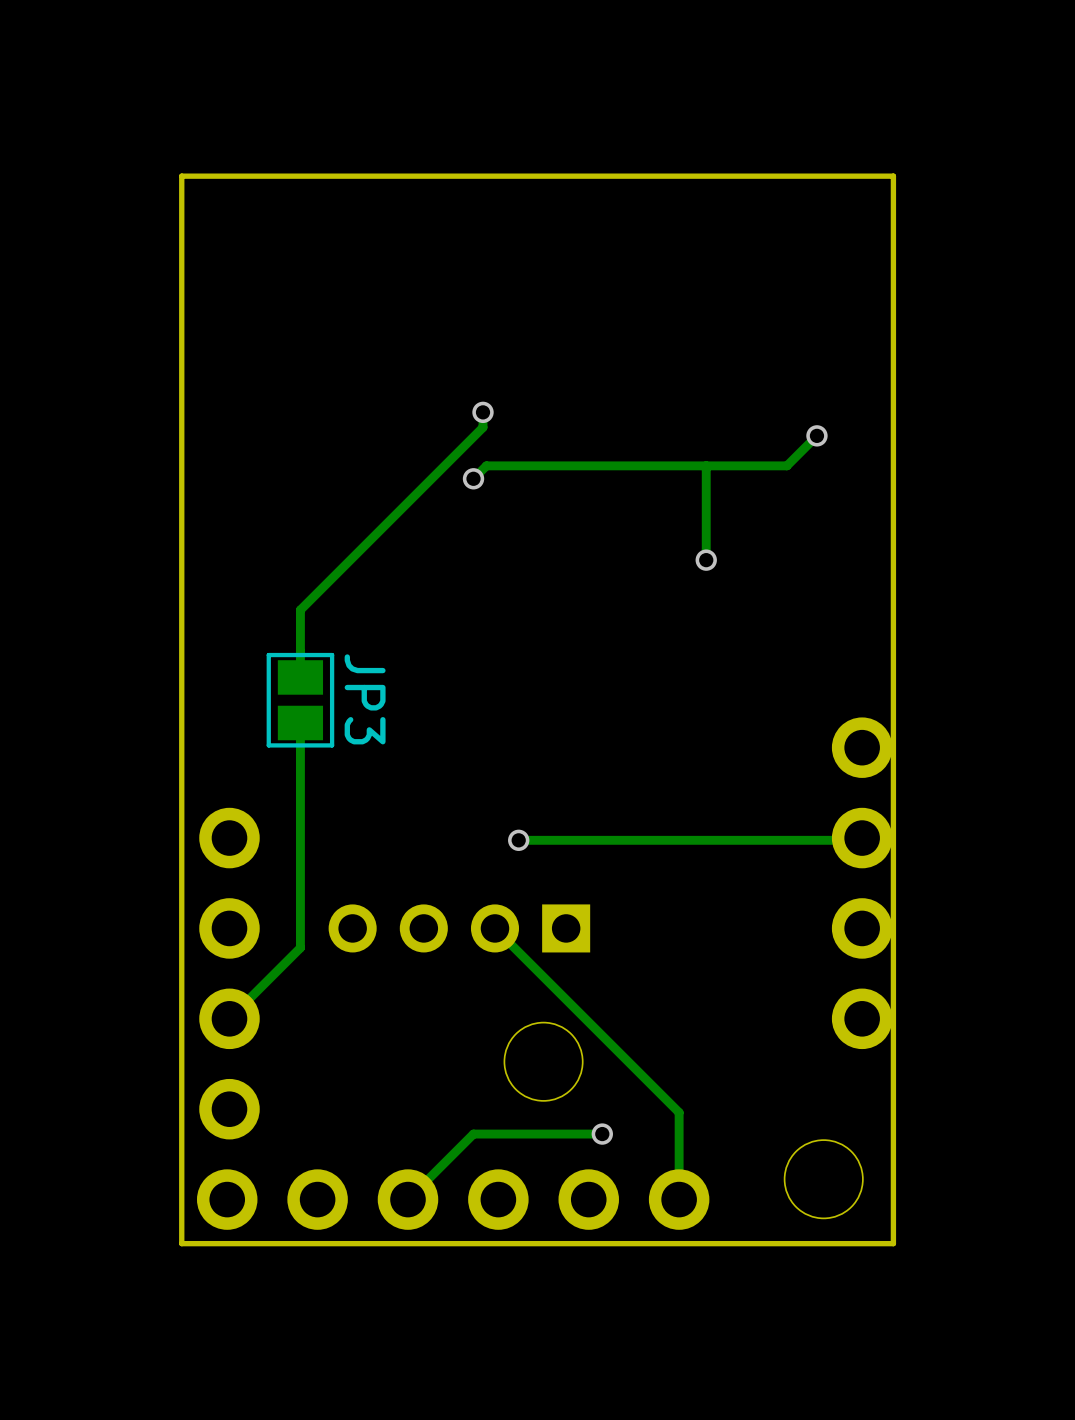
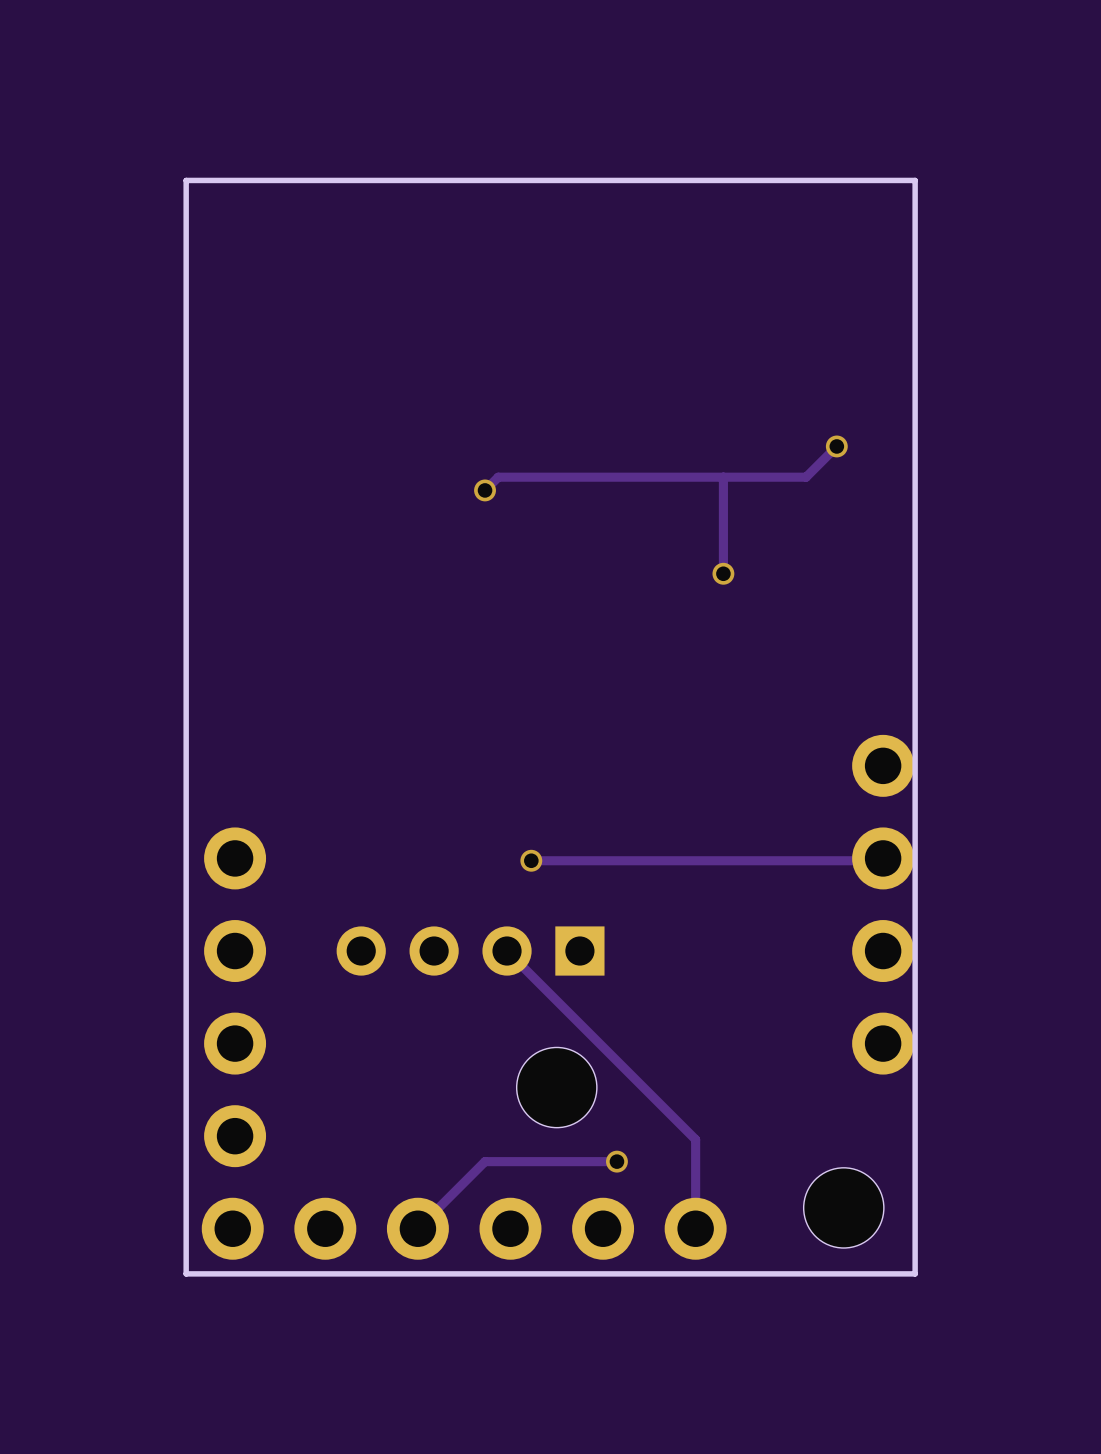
track: (483, 412) (483, 427) (300, 610) (300, 677) -> none
via: (483, 412) -> none
JP3: (300, 700) -> none
track: (300, 723) (300, 947) (229, 1018) -> none

